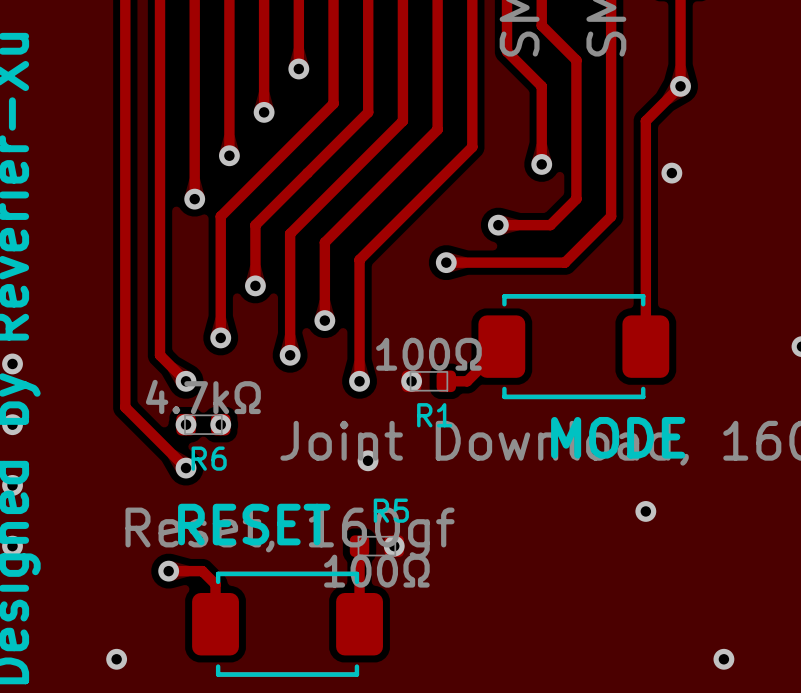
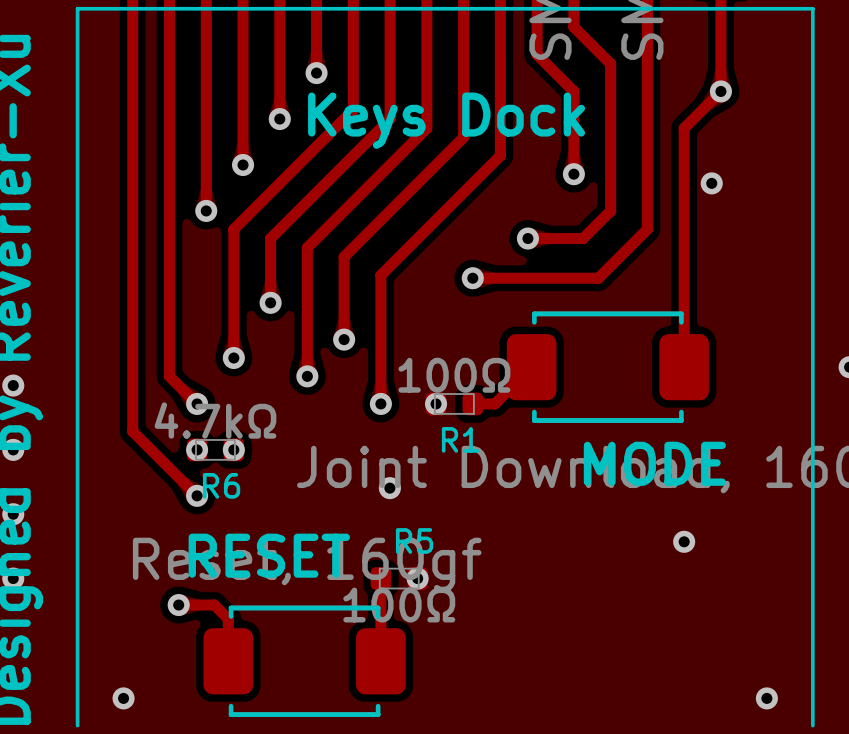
text: none -> Keys Dock (446, 120)
line: none -> (77, 725) (77, 8) (812, 8) (812, 725)

